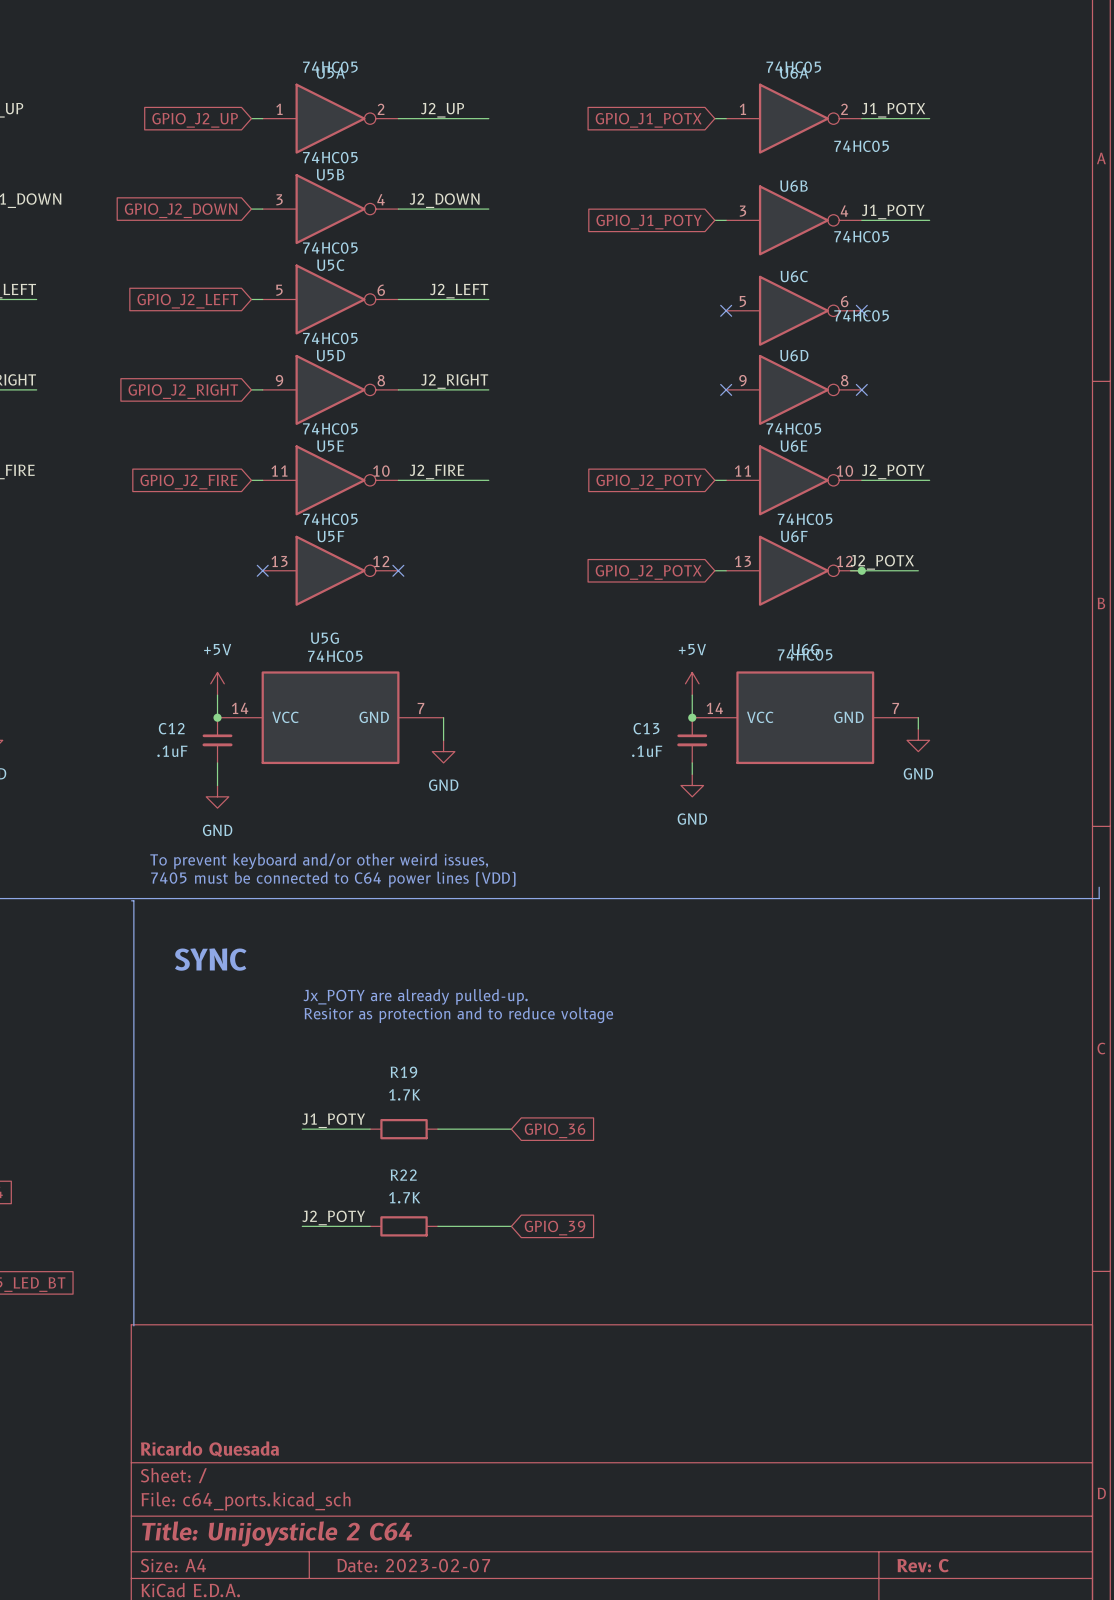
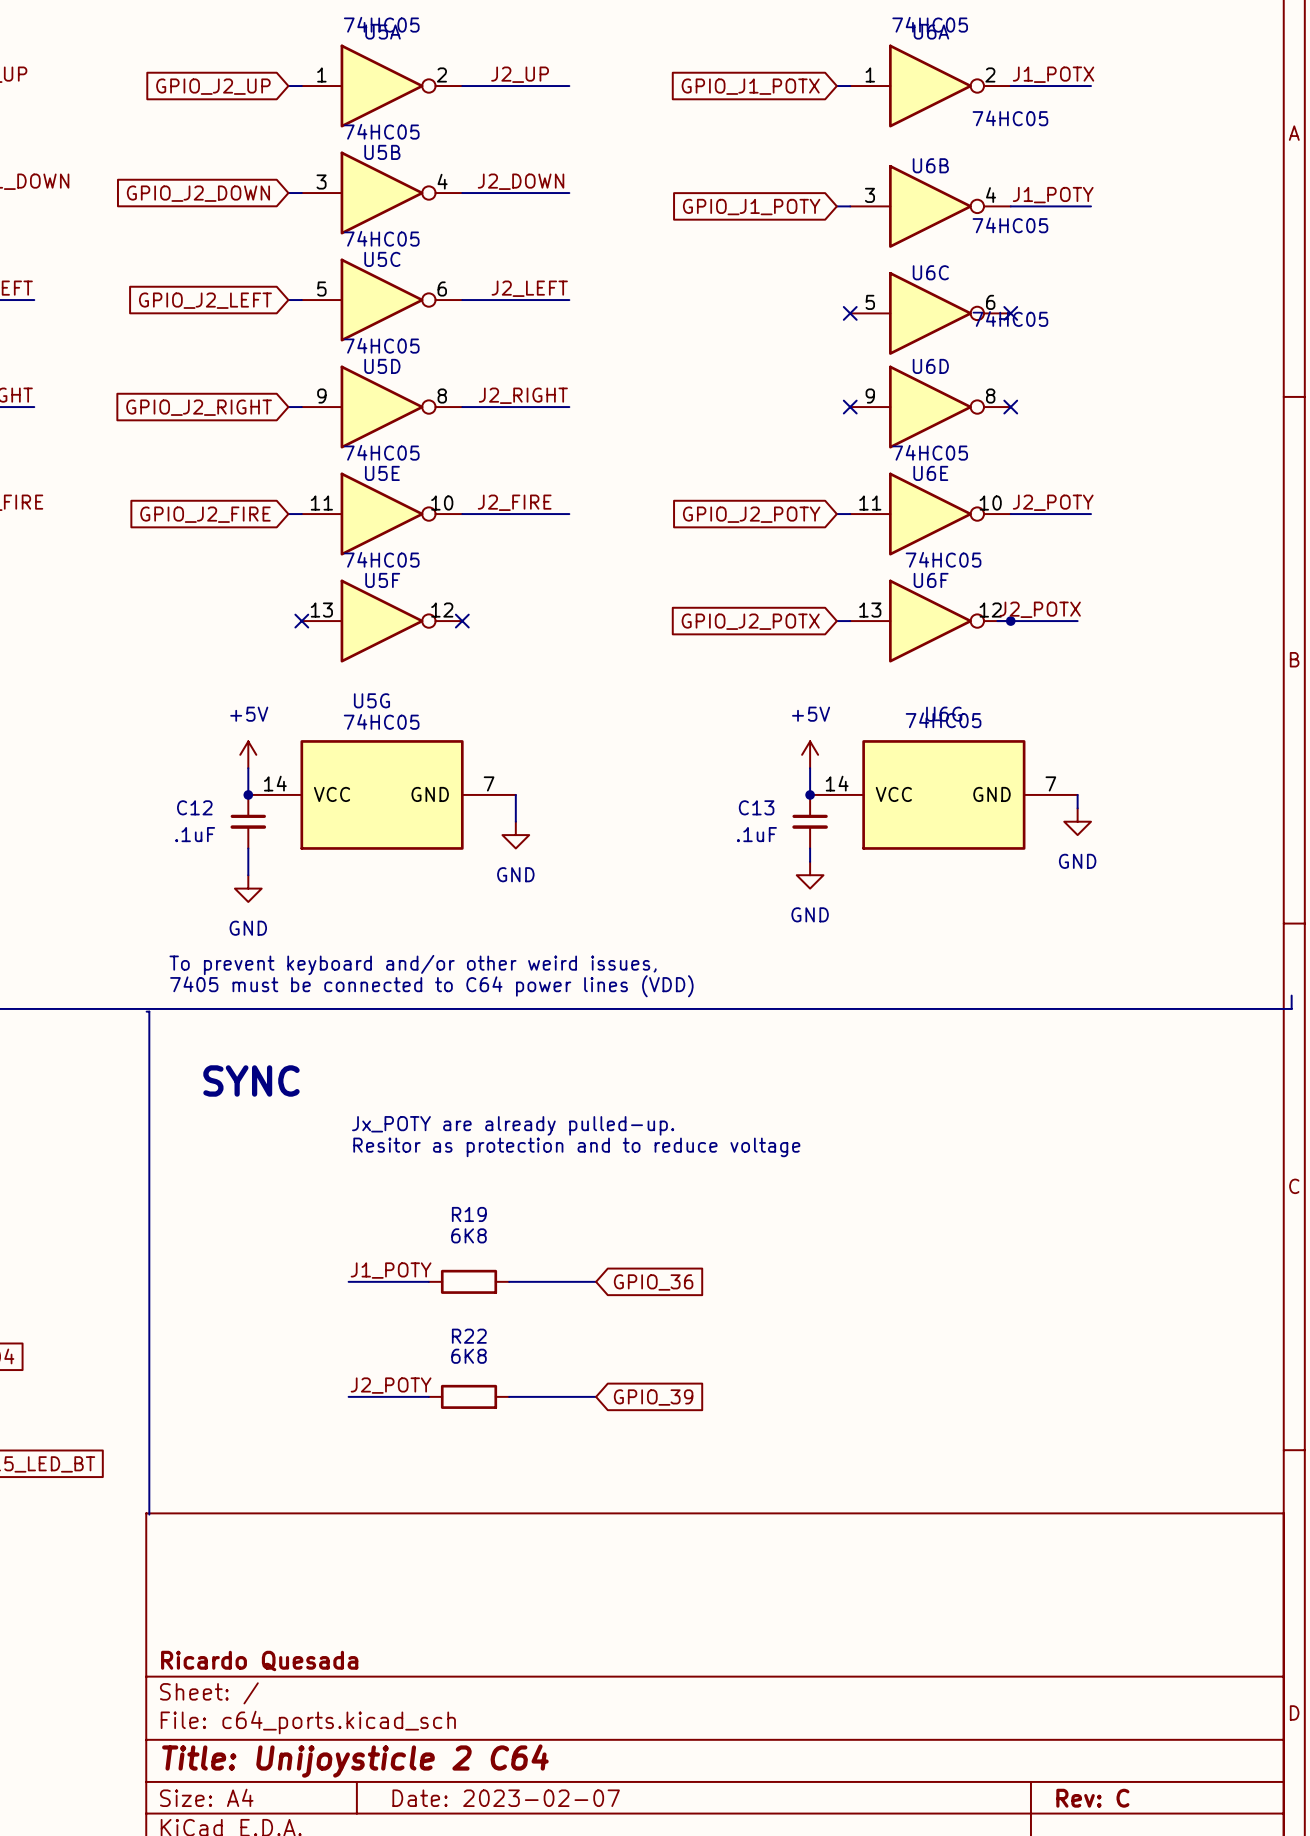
R19 value: 1.7K (404, 1094) -> 6K8 (469, 1235)
R22 value: 1.7K (404, 1197) -> 6K8 (469, 1356)

